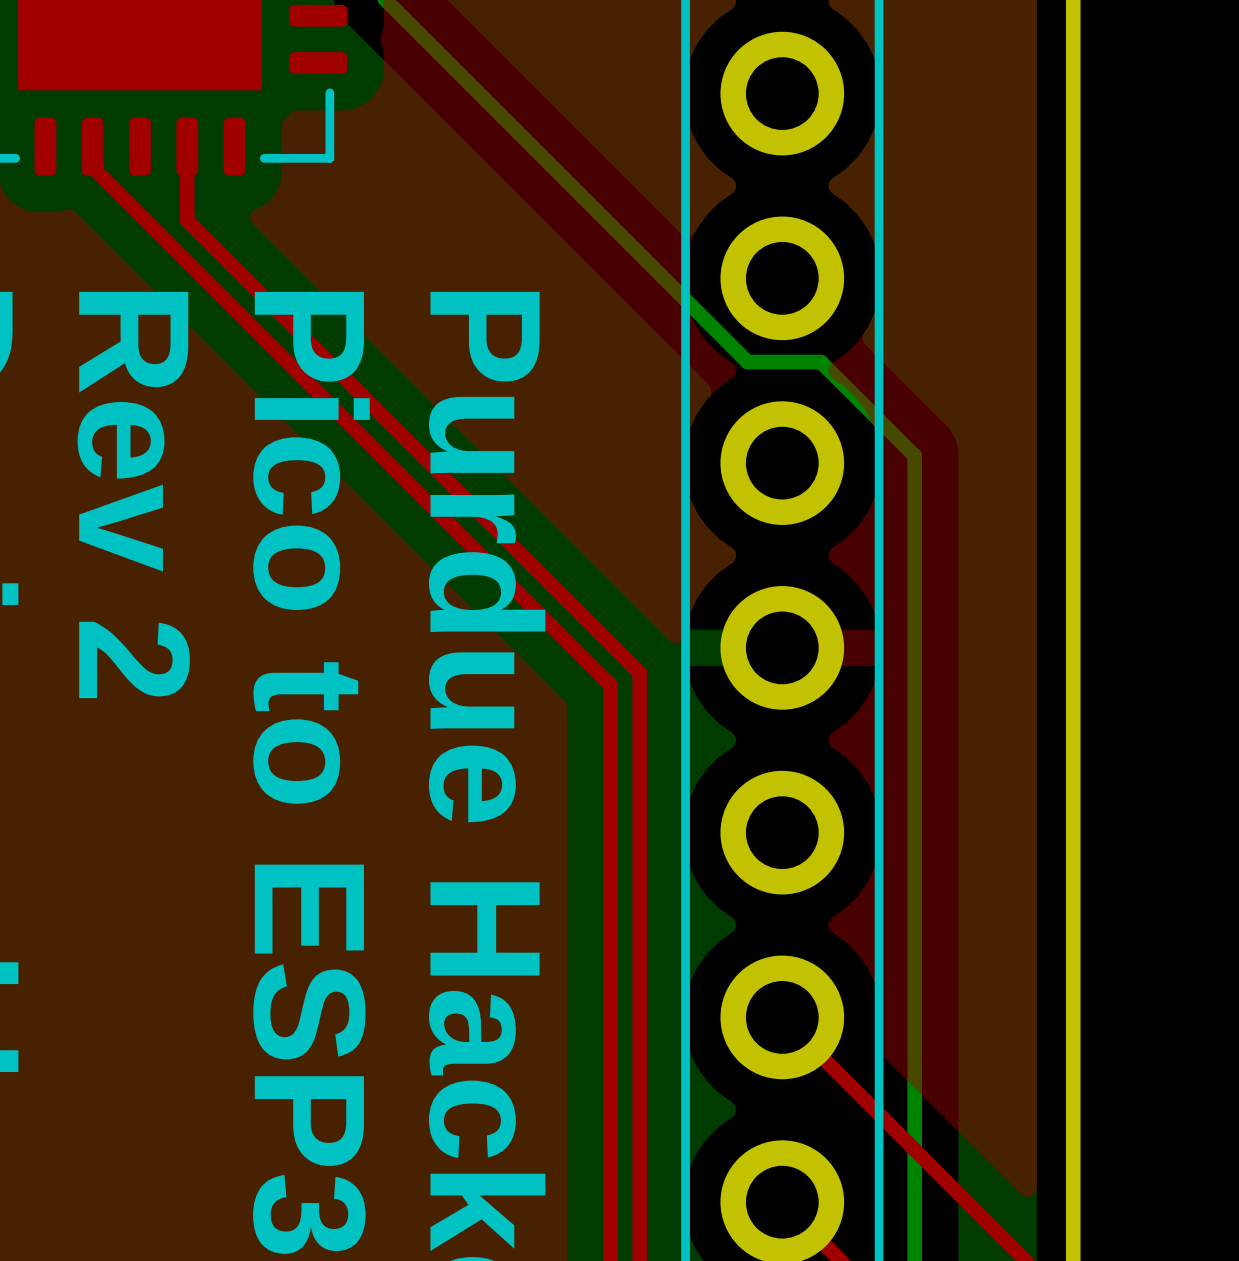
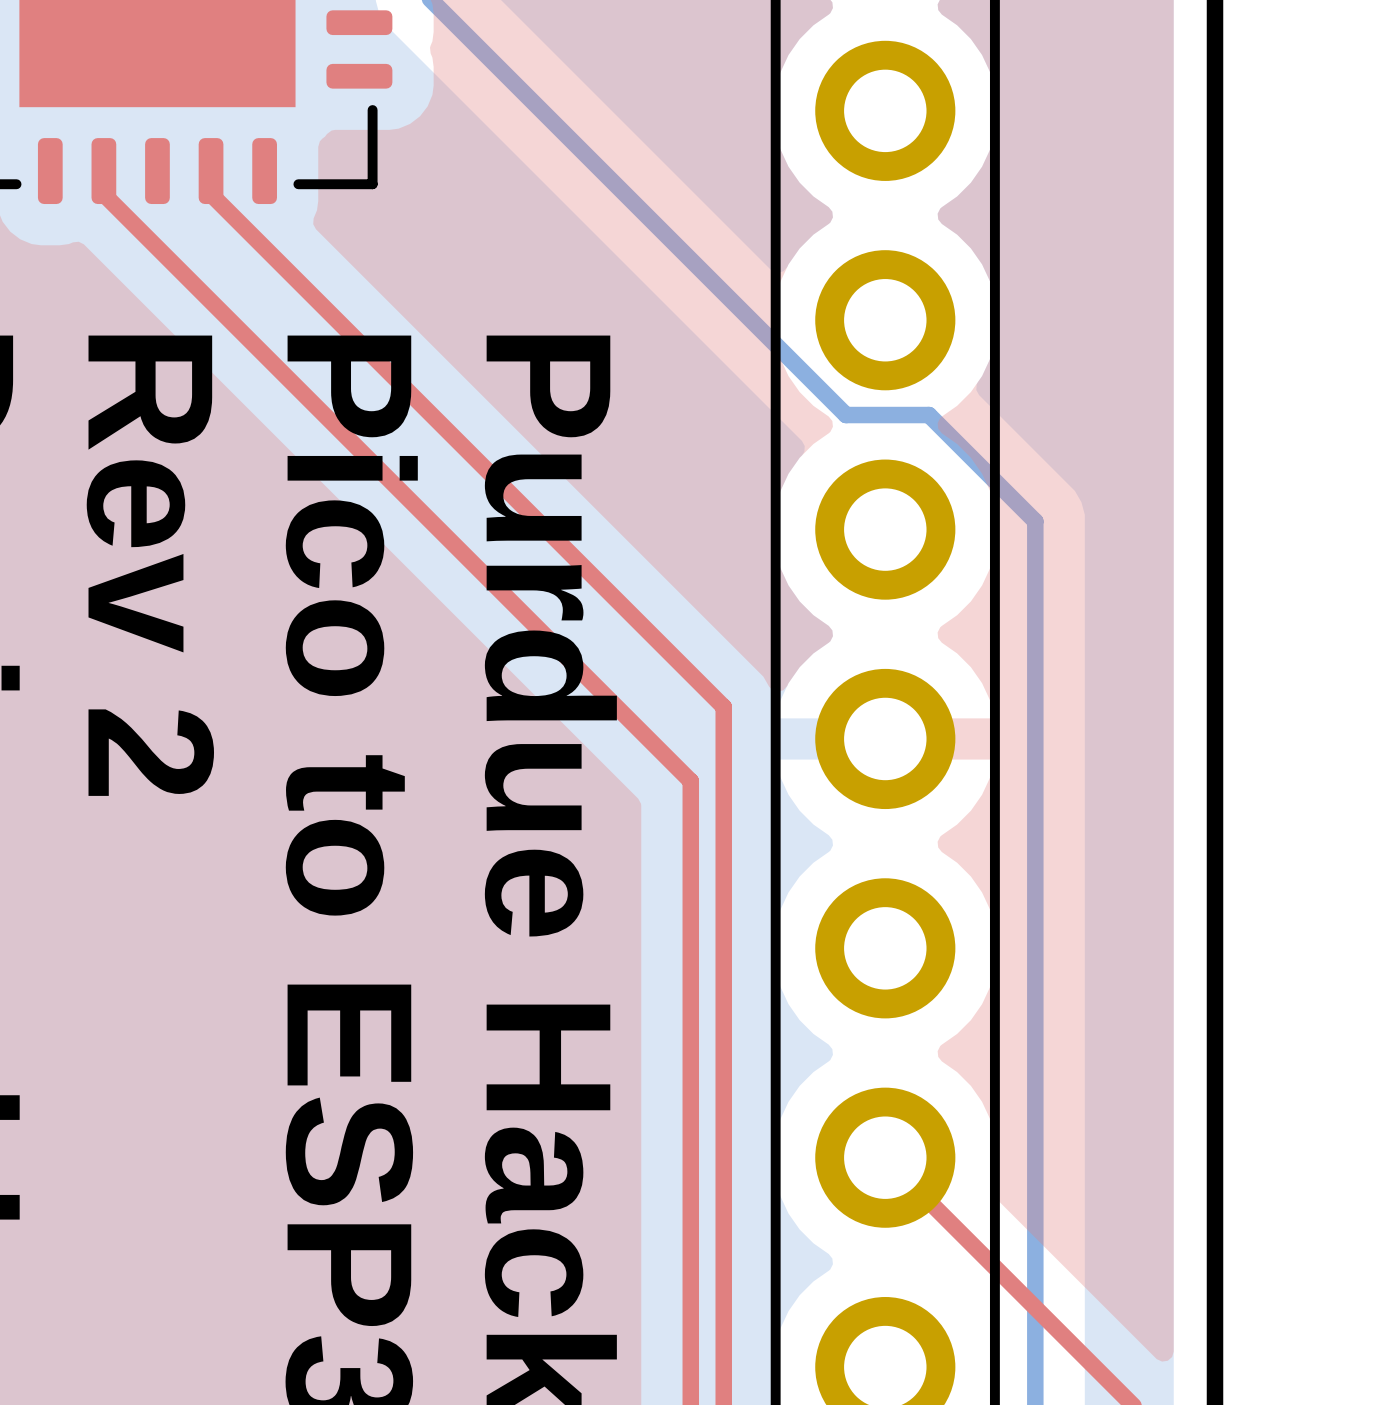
top track: (187, 167) (187, 220) (639, 673) -> (211, 194) (723, 707) (723, 767)

